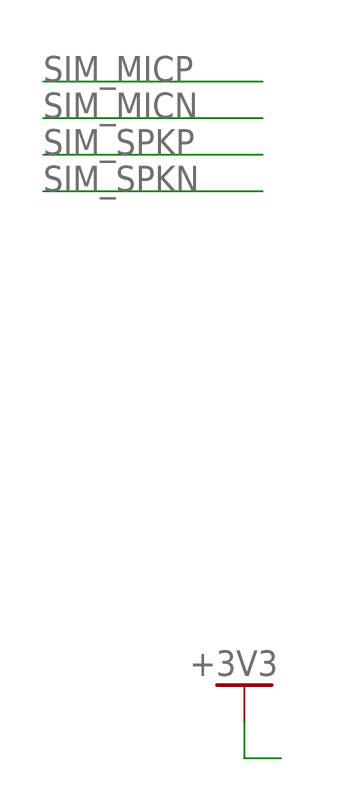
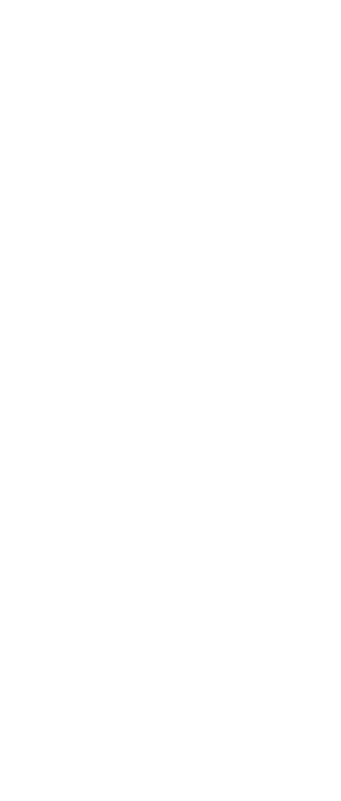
label: SIM_MICP (118, 72) -> none
wire: (43, 81) (262, 81) -> none
label: SIM_MICN (120, 109) -> none
wire: (43, 118) (262, 118) -> none
label: SIM_SPKP (119, 145) -> none
wire: (43, 154) (262, 154) -> none
label: SIM_SPKN (120, 182) -> none
wire: (43, 191) (262, 191) -> none
power symbol: +3V3 (244, 702) -> none
wire: (244, 721) (244, 758) (280, 758) -> none

